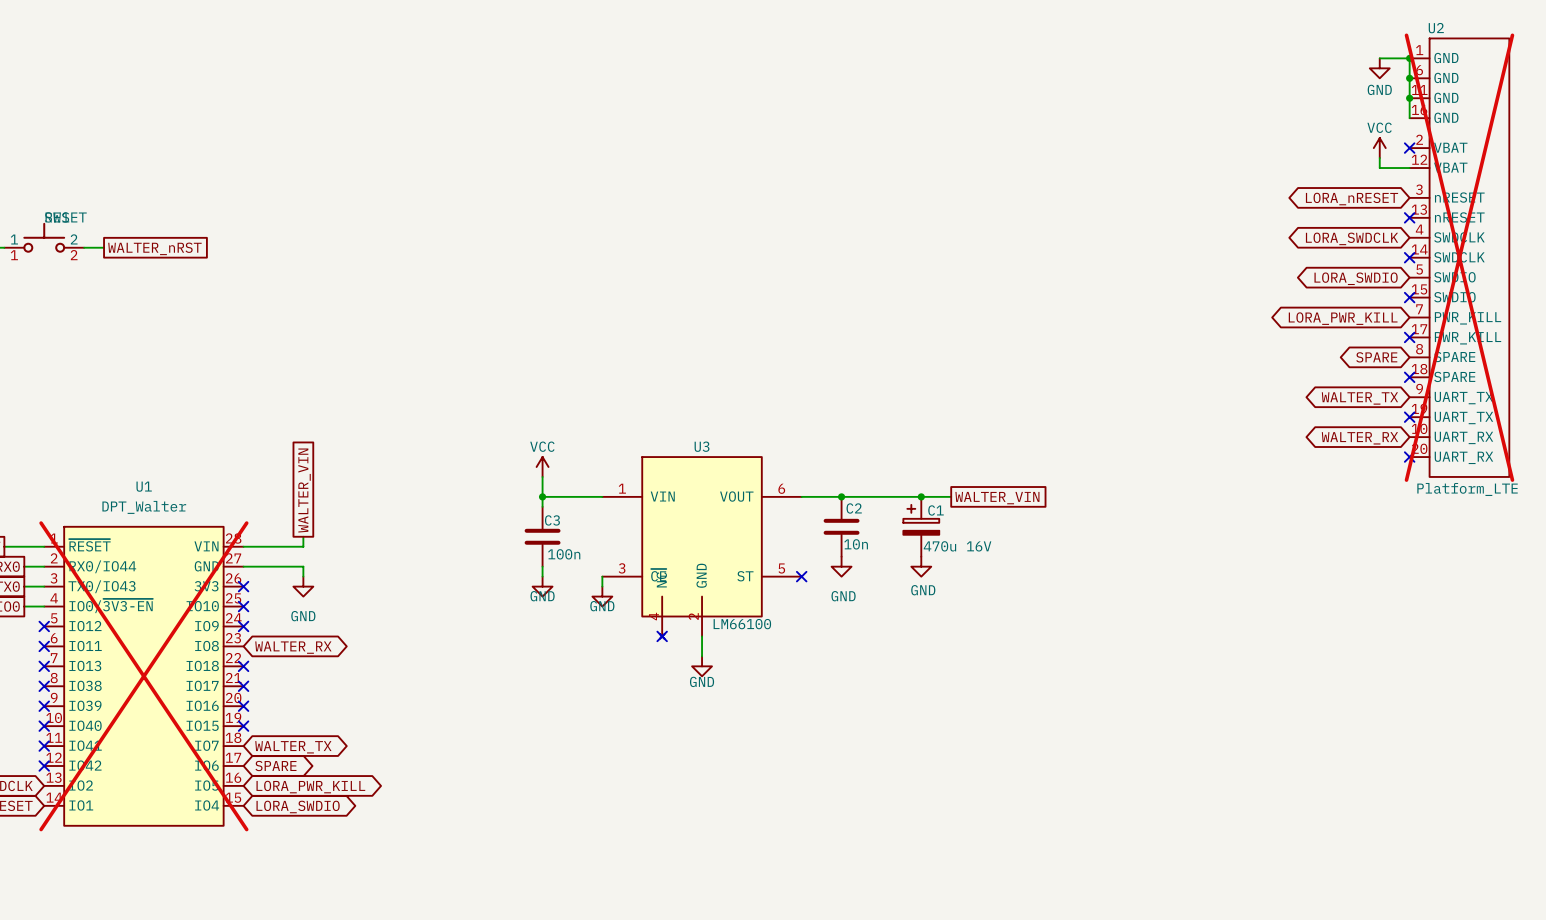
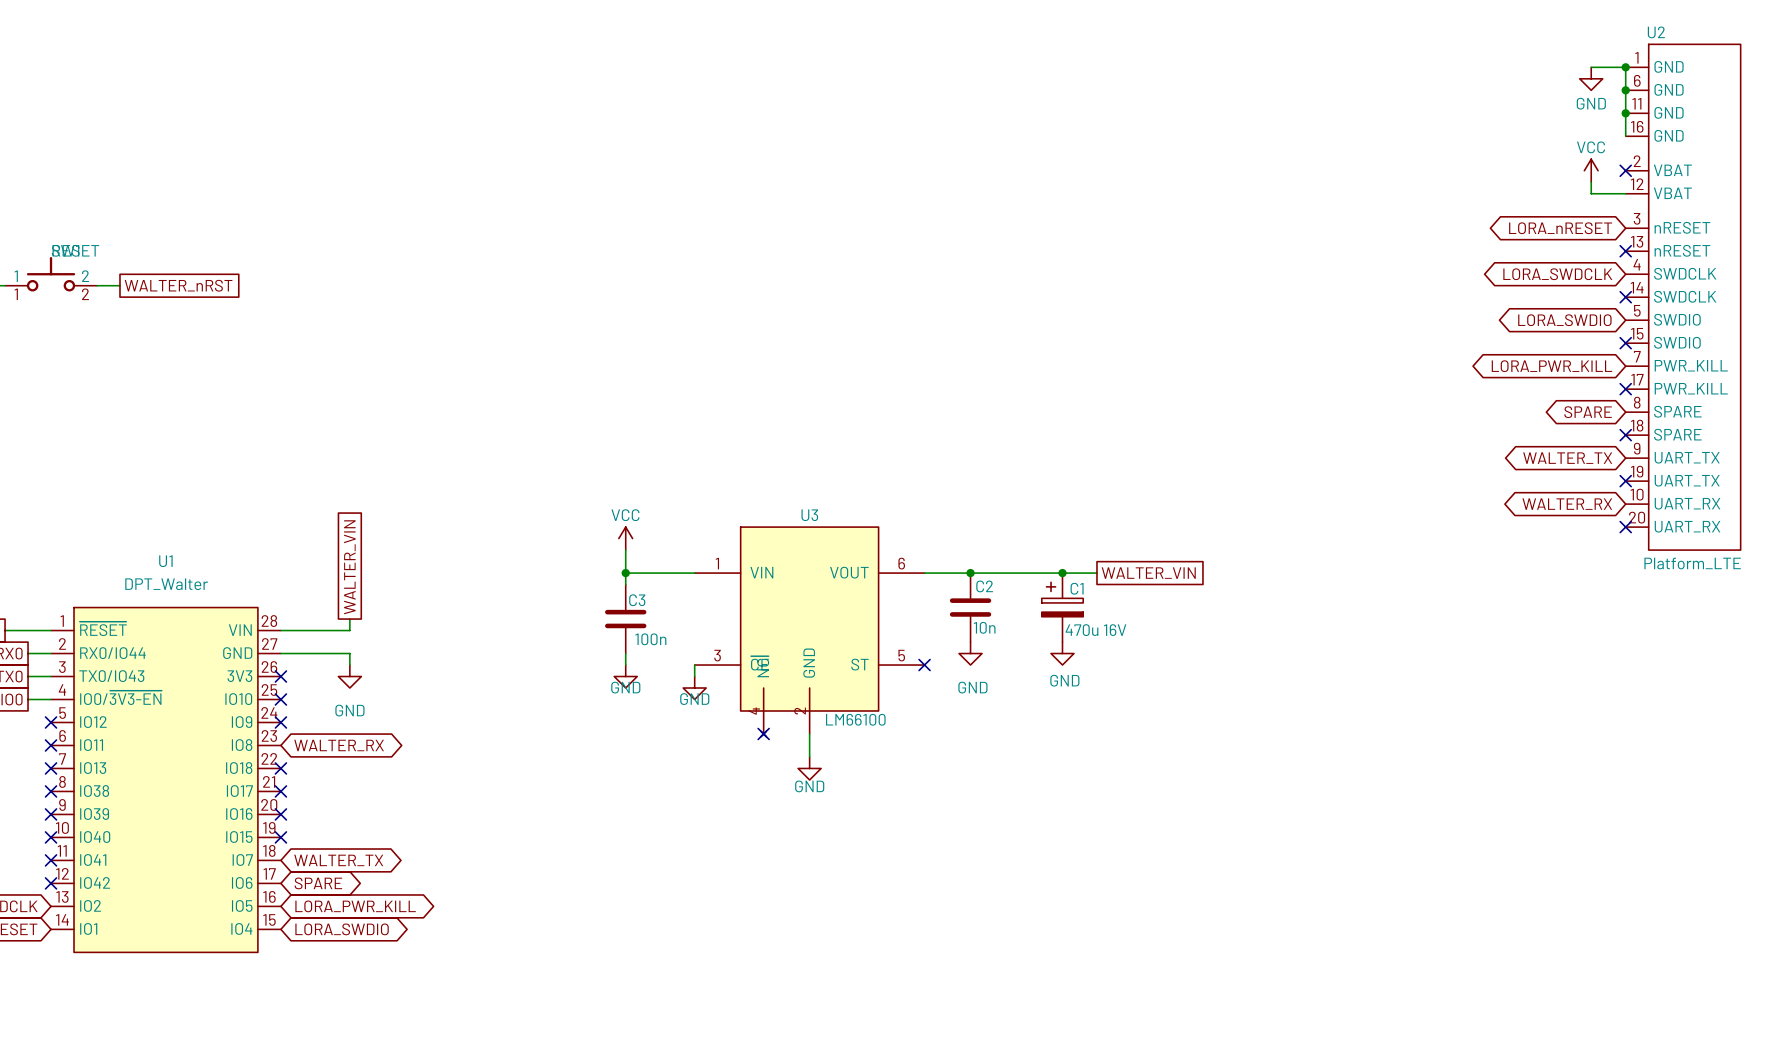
U2 do-not-place cross: (1459, 257) -> none
U1 do-not-place cross: (143, 676) -> none

